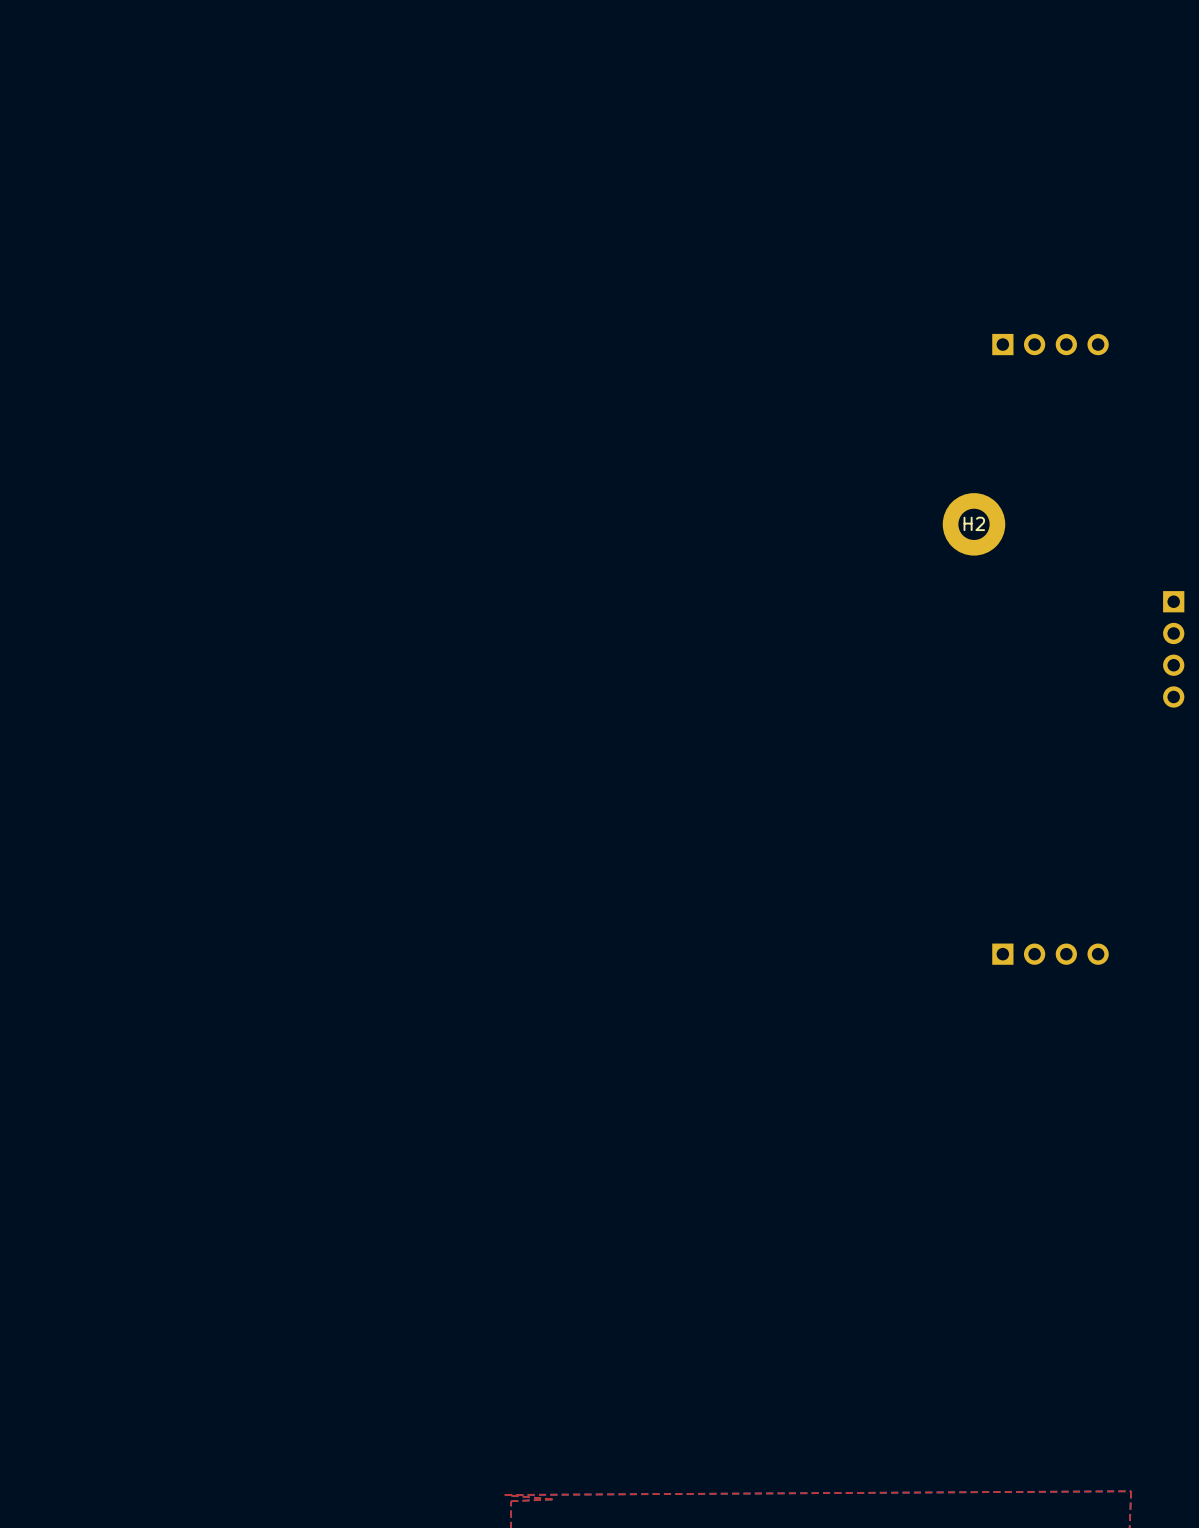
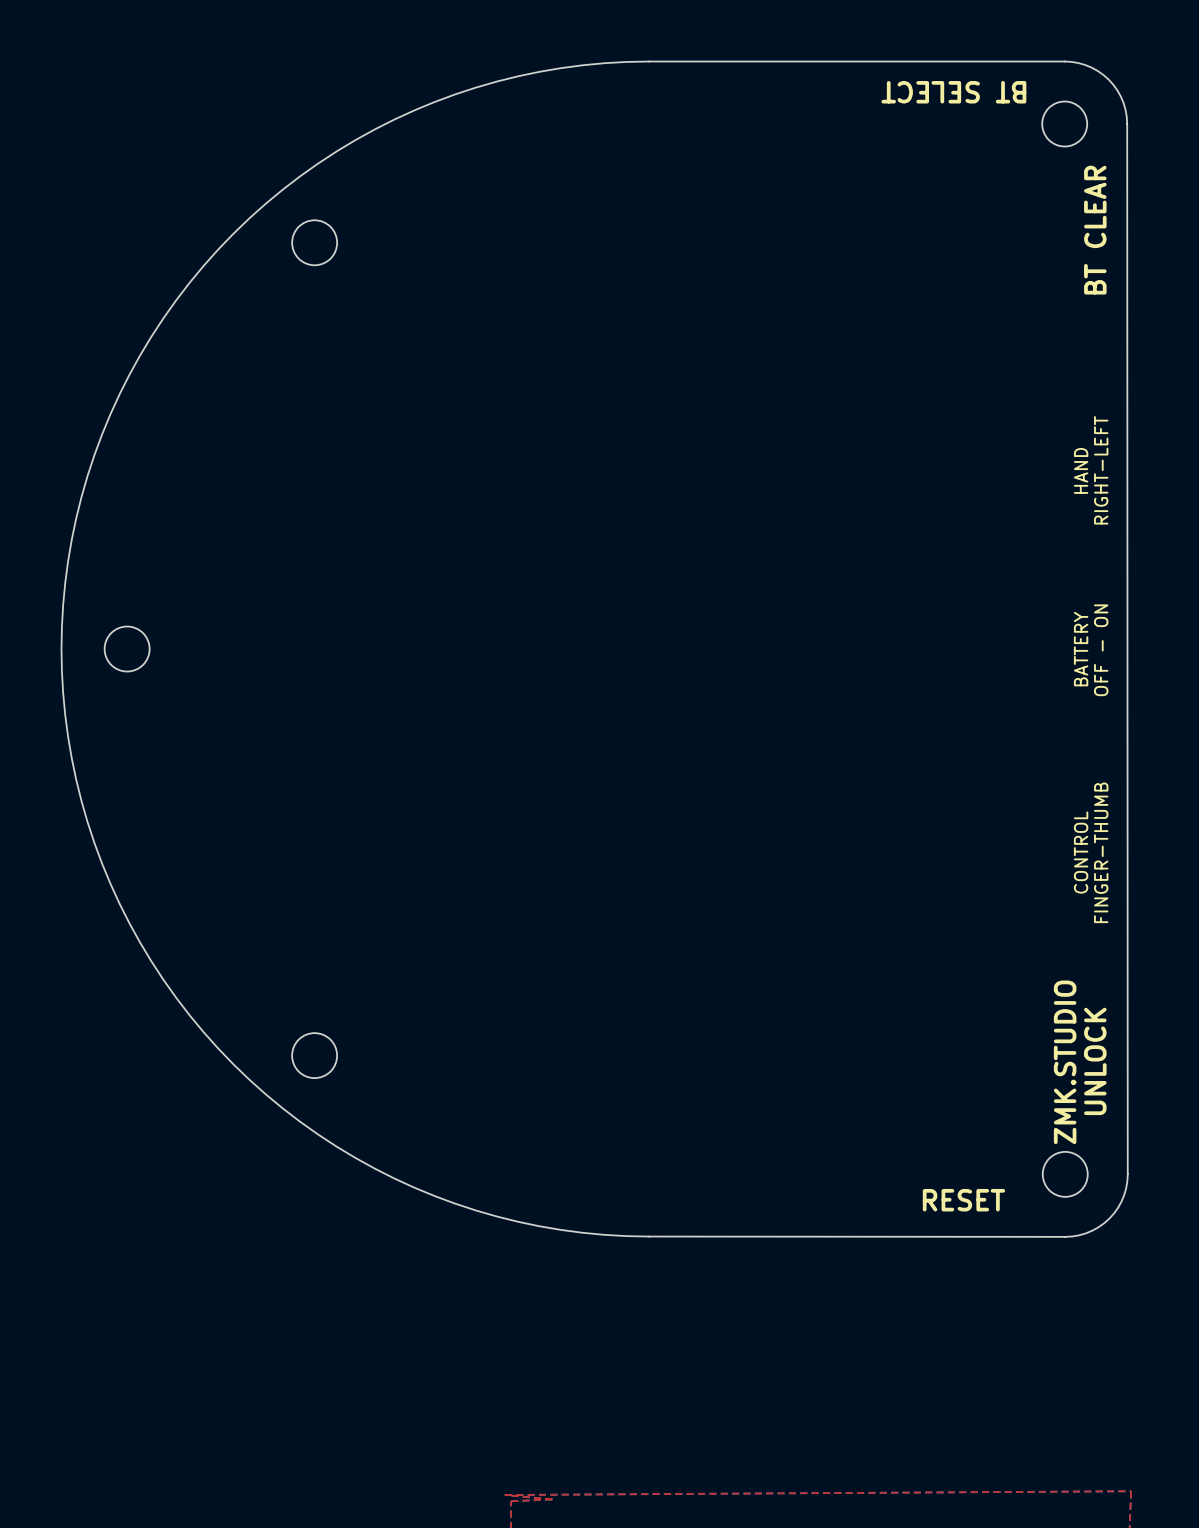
board edge: none -> (649, 61) (1071, 61) (1091, 67) (1103, 75) (1117, 90) (1123, 103) (1127, 123) (1127, 1174) (1124, 1195) (1114, 1213) (1098, 1227) (1085, 1233) (1065, 1236) (605, 1234) (561, 1229) (518, 1221) (475, 1210) (434, 1195) (374, 1168) (318, 1134) (265, 1094) (233, 1064) (203, 1032) (163, 979) (129, 923) (102, 863) (81, 801) (68, 736) (63, 692) (61, 649) (65, 583) (76, 518) (94, 454) (119, 394) (140, 355) (163, 318) (189, 282) (218, 249) (265, 203) (318, 163) (374, 129) (414, 110) (454, 94) (518, 76) (583, 65) (649, 61)
text: none -> BT SELECT (953, 92)
round board edge: none -> [1041, 101, 1088, 147]
round board edge: none -> [291, 219, 338, 266]
text: none -> BT CLEAR (1095, 230)
part: (1050, 344) -> none
text: none -> HAND (1081, 470)
text: none -> RIGHT-LEFT (1101, 470)
H2: (974, 524) -> none
round board edge: none -> [104, 626, 150, 672]
text: none -> BATTERY (1081, 649)
part: (1173, 649) -> none
text: none -> OFF - ON (1101, 650)
text: none -> CONTROL (1081, 852)
text: none -> FINGER-THUMB (1101, 852)
part: (1050, 954) -> none
round board edge: none -> [291, 1032, 338, 1079]
text: none -> UNLOCK (1095, 1061)
text: none -> ZMK.STUDIO (1065, 1062)
round board edge: none -> [1042, 1151, 1089, 1198]
text: none -> RESET (963, 1200)

